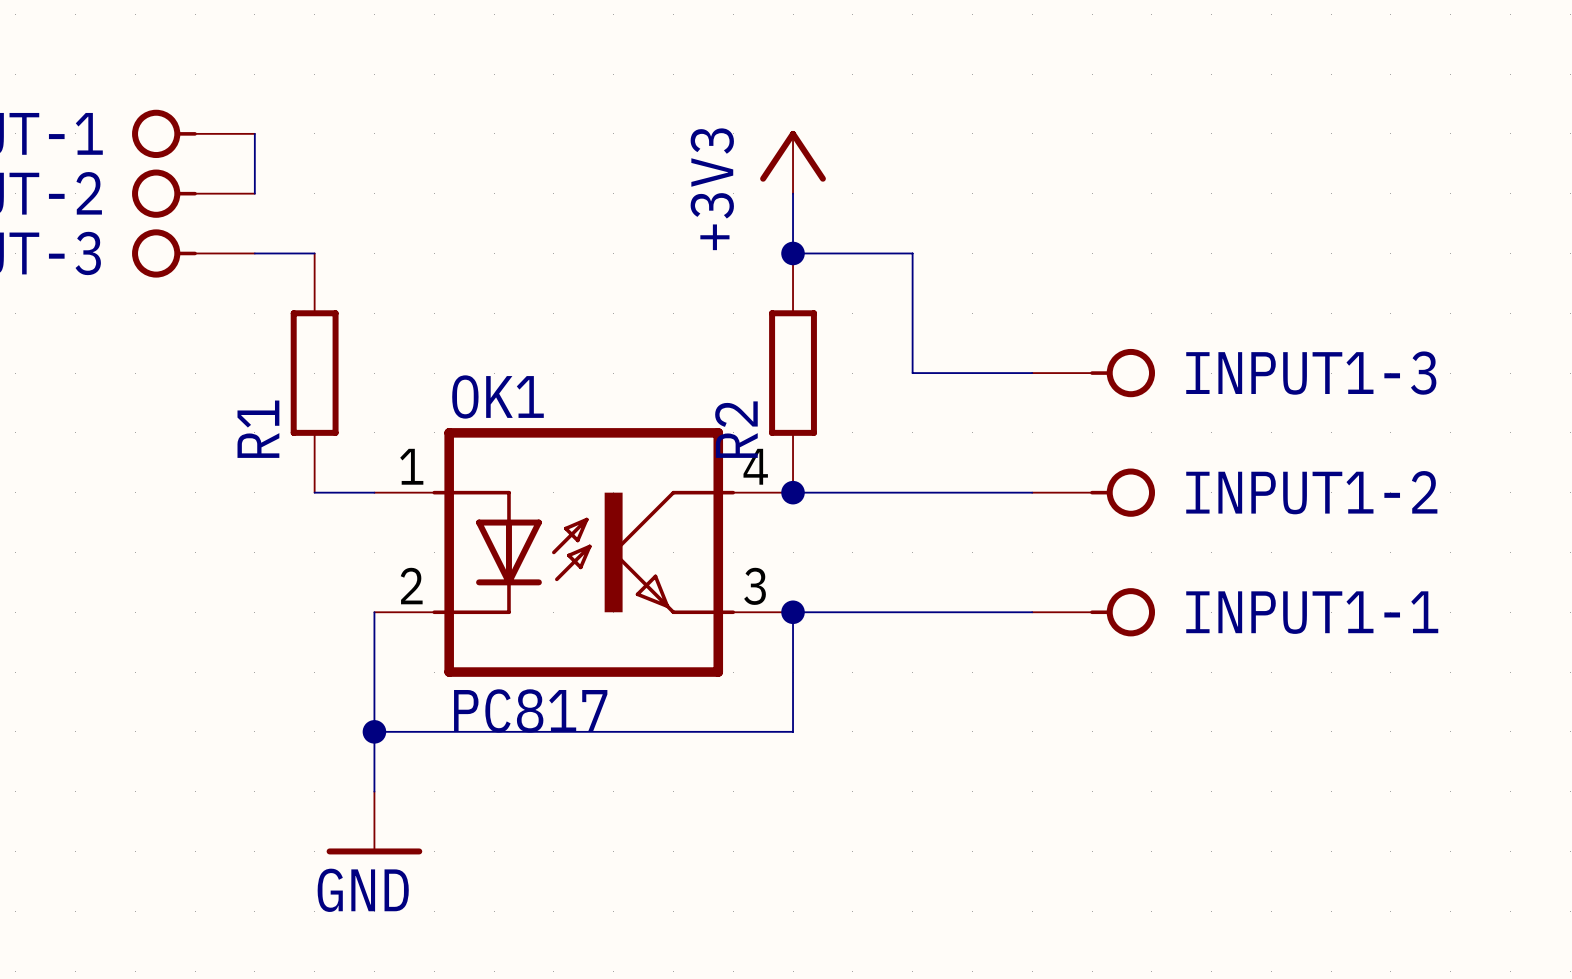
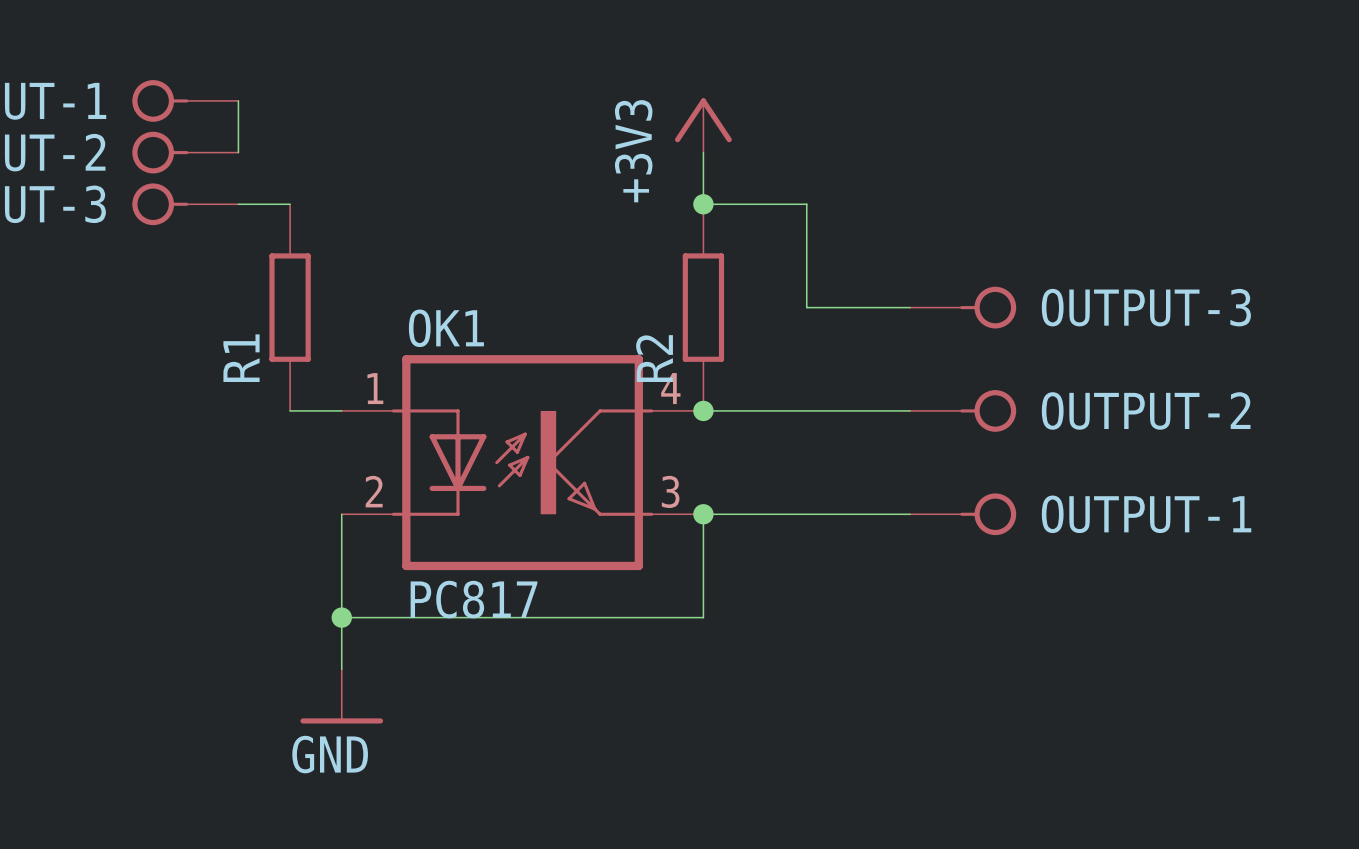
INPUT1-3 name: INPUT1-3 (1311, 373) -> OUTPUT-3 (1146, 307)
INPUT1-2 name: INPUT1-2 (1311, 492) -> OUTPUT-2 (1146, 410)
INPUT1-1 name: INPUT1-1 (1312, 612) -> OUTPUT-1 (1146, 514)

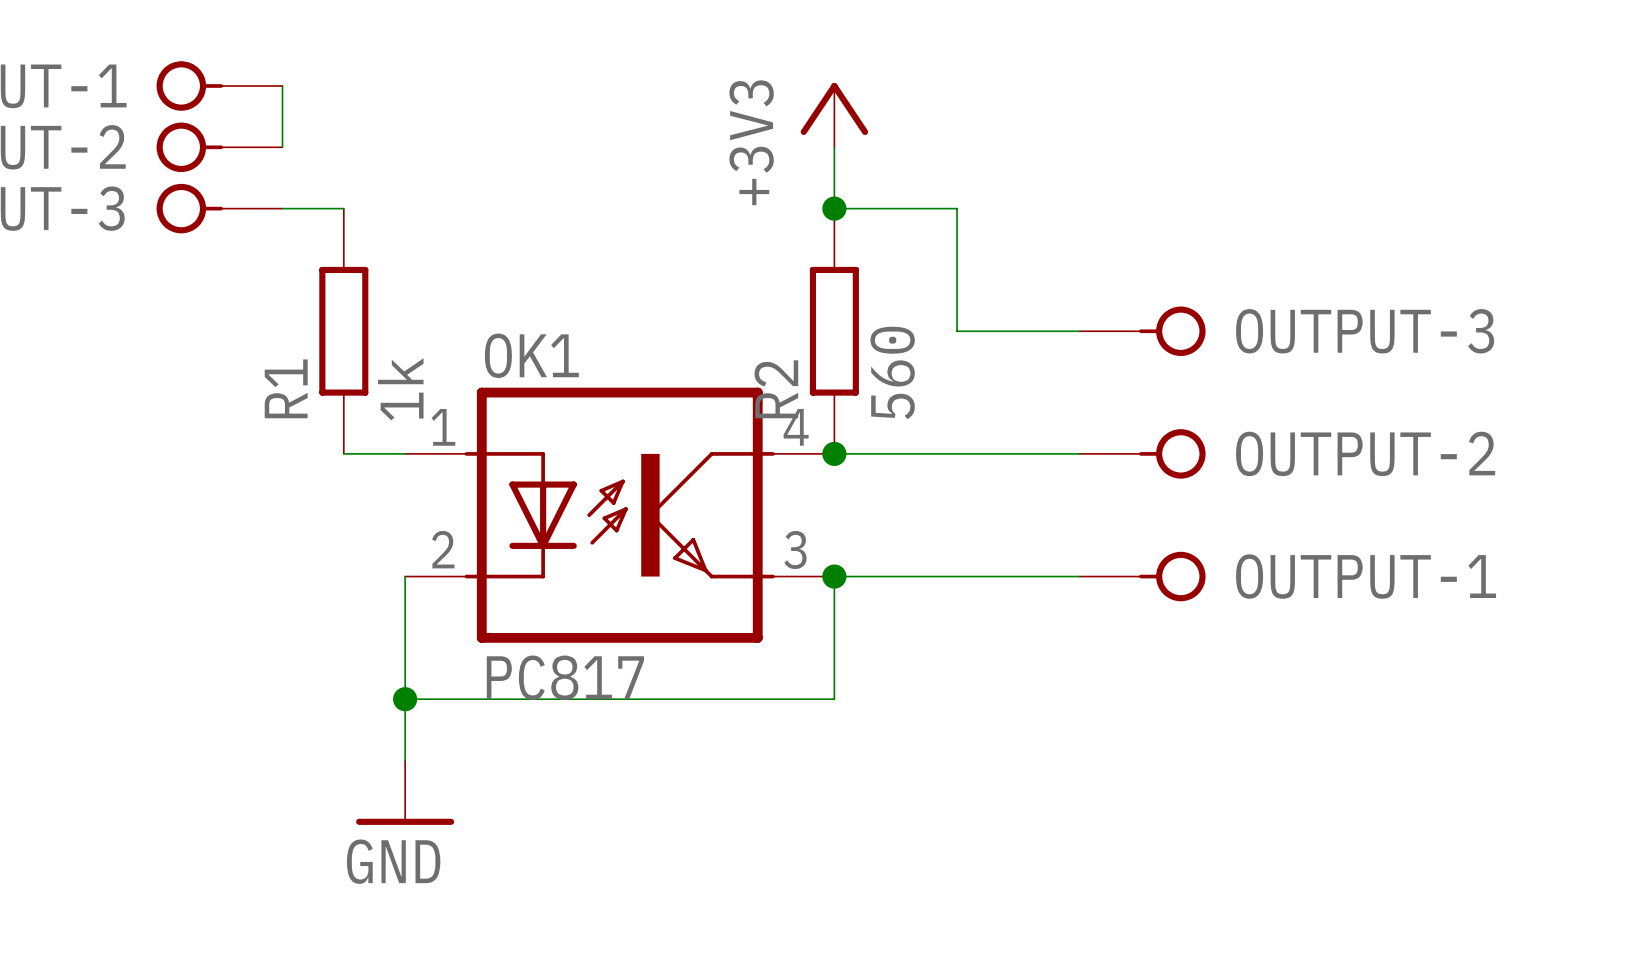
R2 value: none -> 560 (892, 372)
R1 value: none -> 1k (400, 389)

